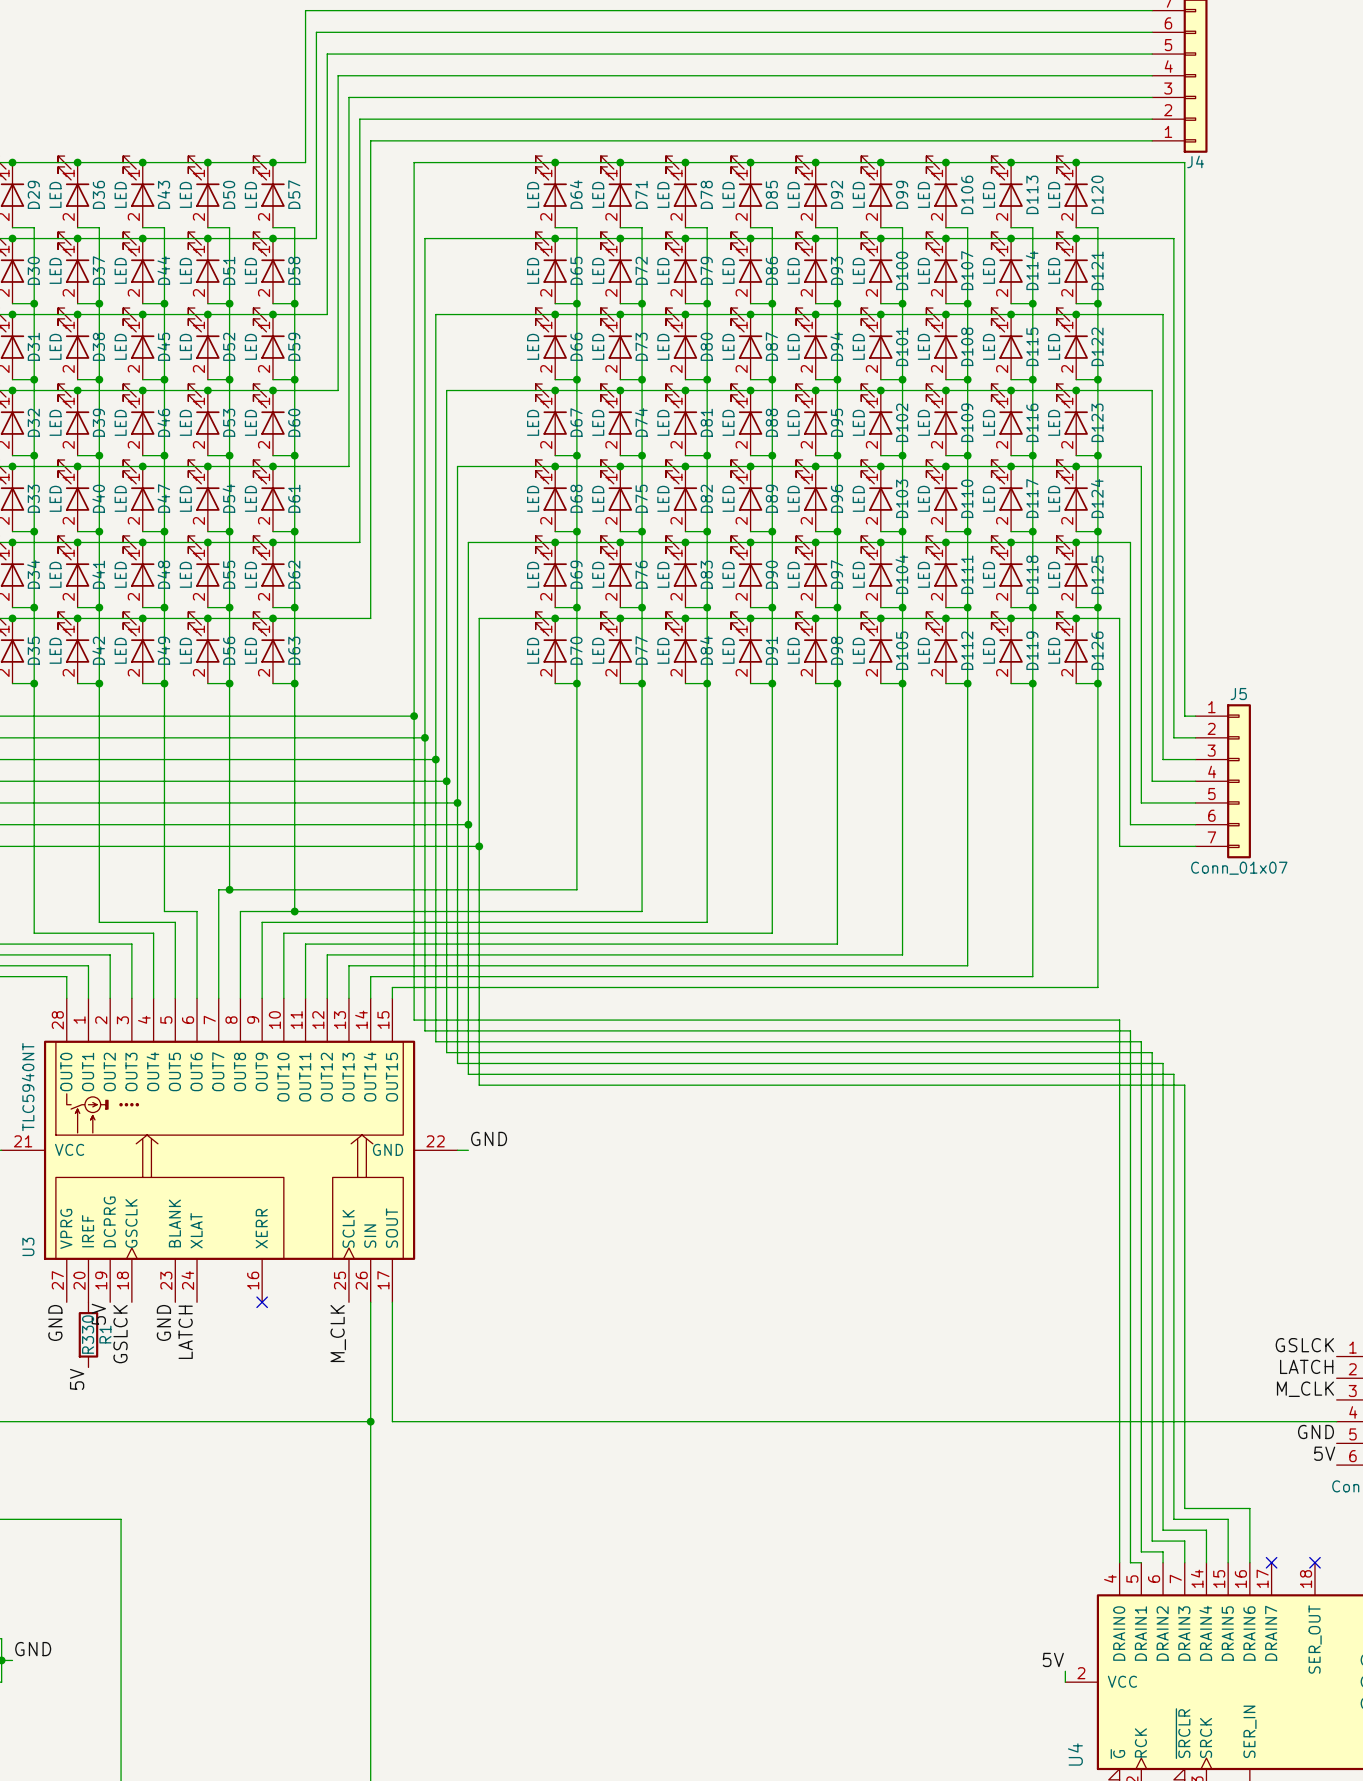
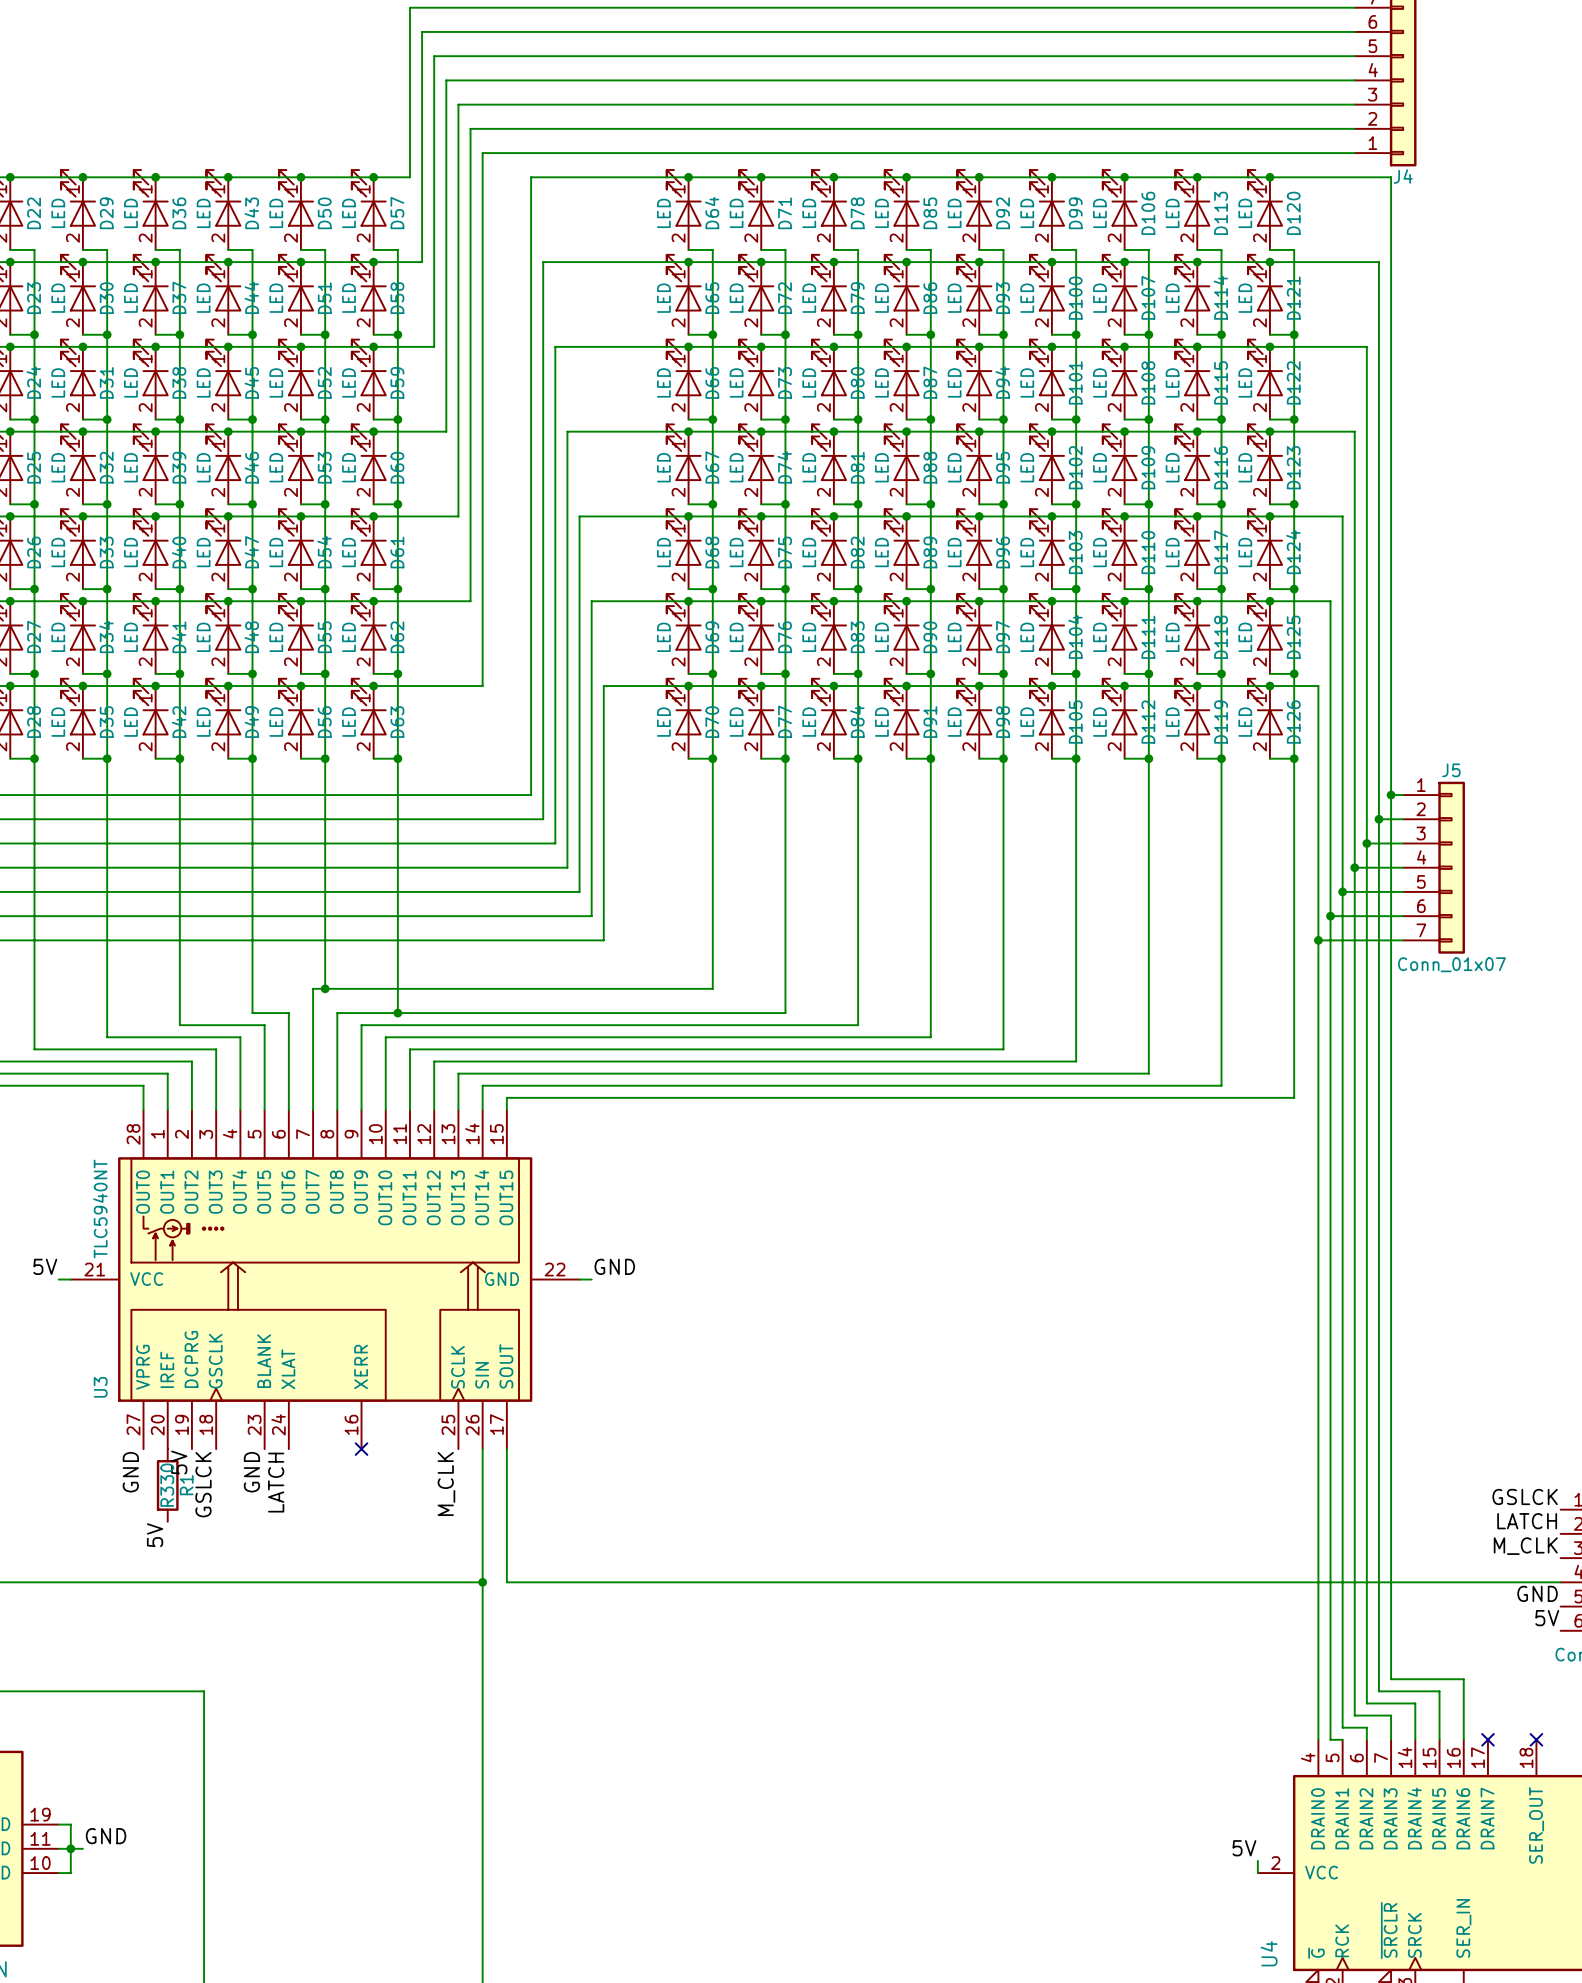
wire: (414, 716) (414, 1020) (1119, 1020) -> (1318, 940) (1318, 1134)
junction: (414, 716) -> none
junction: none -> (1391, 795)
wire: (424, 737) (424, 1030) (1130, 1030) -> (1330, 916) (1330, 1146)
junction: (424, 737) -> none
junction: none -> (1378, 819)
wire: (435, 759) (435, 1041) (1141, 1041) -> (1342, 891) (1342, 1158)
junction: (435, 759) -> none
junction: none -> (1366, 843)
wire: (446, 781) (446, 1052) (1152, 1052) -> (1354, 867) (1354, 1170)
junction: (446, 781) -> none
junction: none -> (1354, 867)
wire: (457, 802) (457, 1063) (1163, 1063) -> (1366, 843) (1366, 1182)
junction: (457, 802) -> none
junction: none -> (1342, 891)
wire: (468, 824) (468, 1074) (1173, 1074) -> (1378, 819) (1378, 1194)
junction: (468, 824) -> none
junction: none -> (1330, 916)
wire: (479, 846) (479, 1085) (1184, 1085) -> (1391, 795) (1391, 1206)
junction: (479, 846) -> none
junction: none -> (1318, 940)

